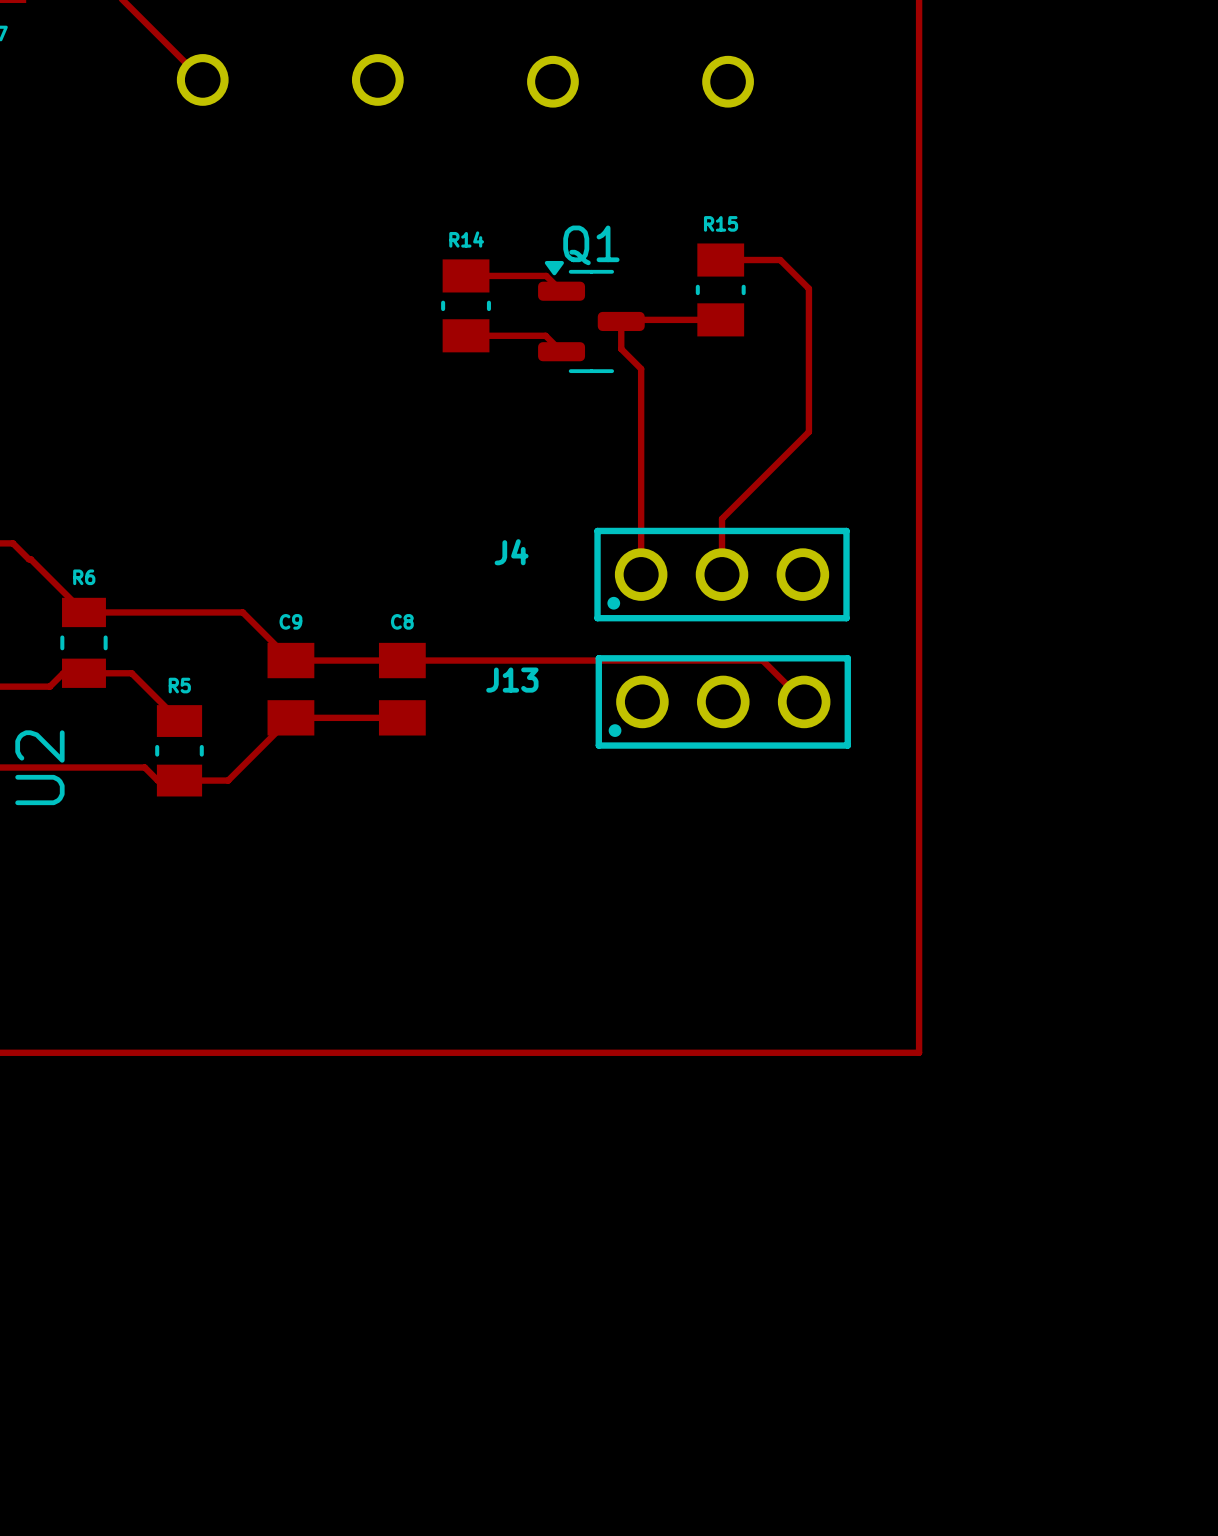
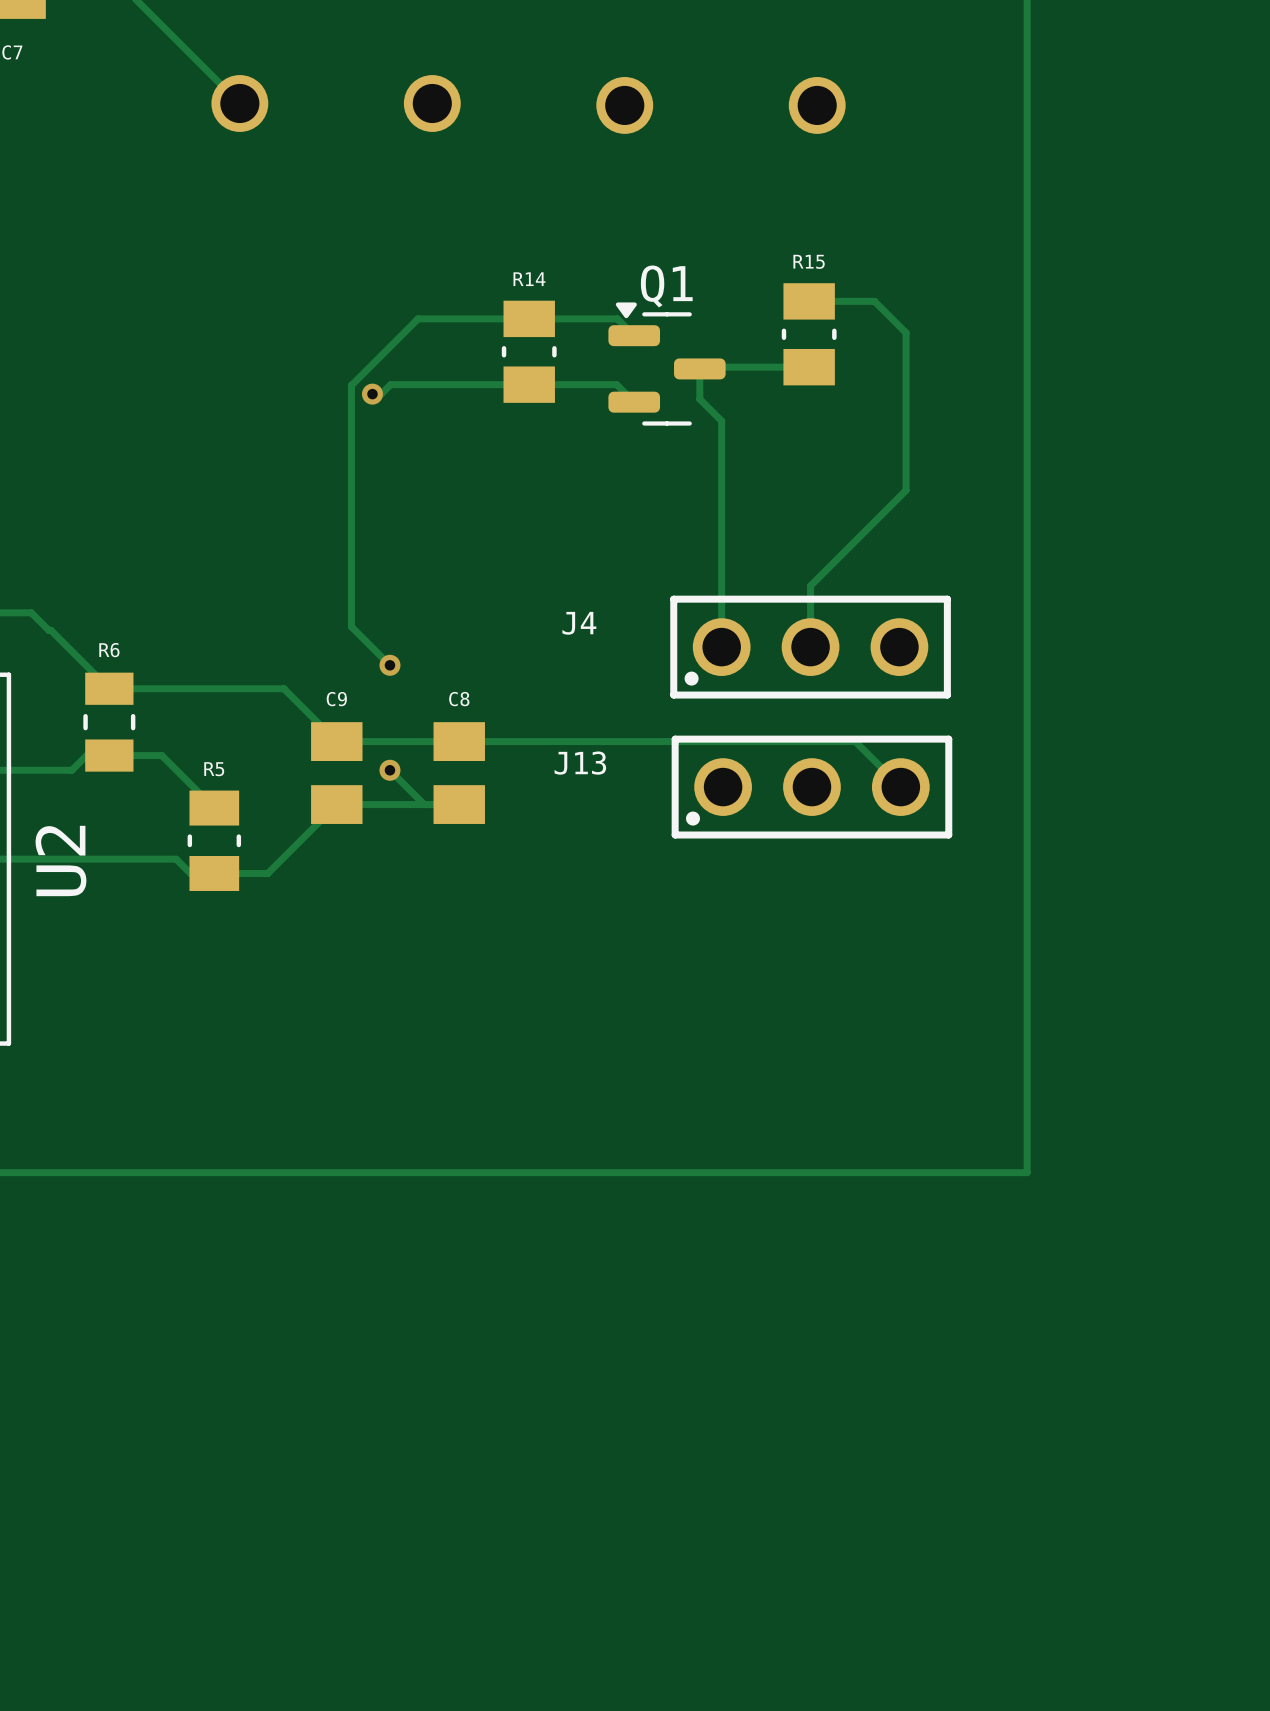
track: none -> (529, 318) (418, 318) (351, 385) (351, 626) (389, 665)
track: none -> (529, 384) (390, 384) (381, 394) (372, 394)
via: none -> (372, 394)
via: none -> (389, 665)
track: none -> (389, 770) (424, 804)
via: none -> (389, 770)

